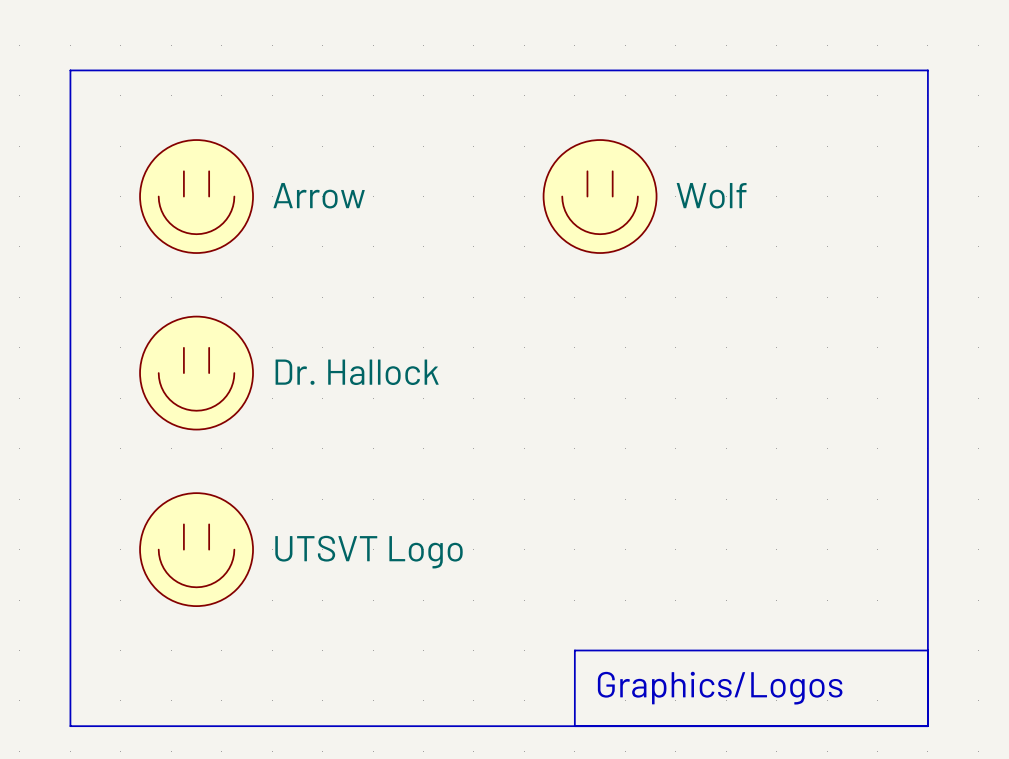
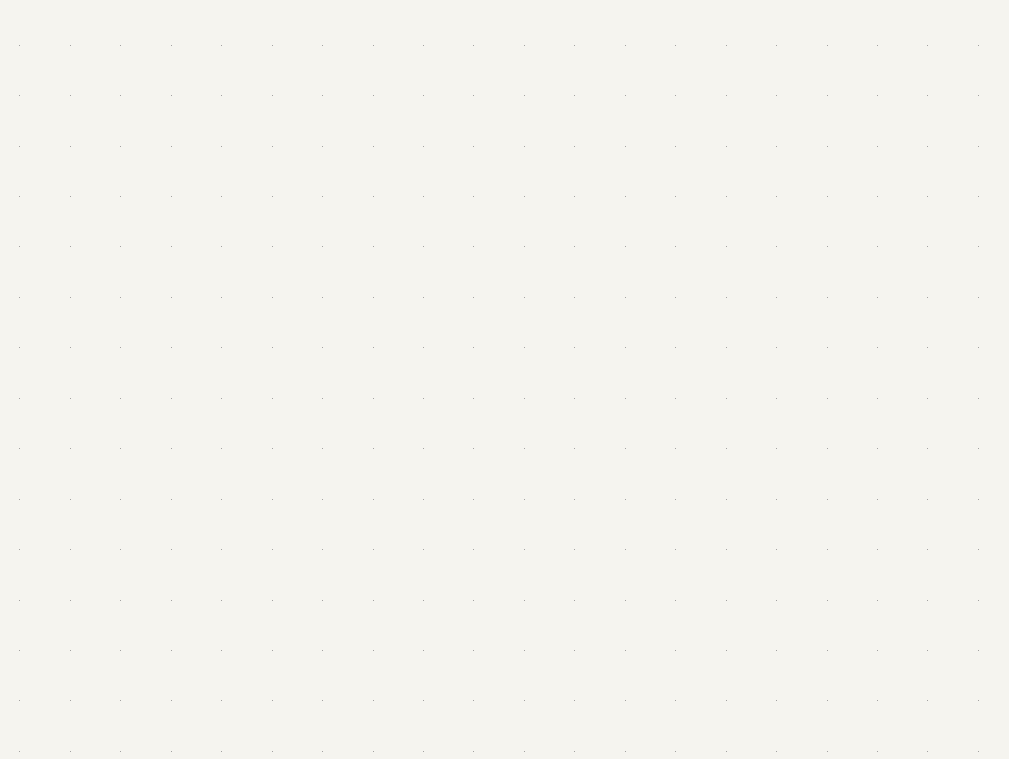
line: (70, 70) (927, 70) (927, 726) (70, 726) (70, 70) -> none
part: Arrow (196, 196) -> none
part: Wolf (600, 196) -> none
part: Dr. Hallock (196, 373) -> none
part: UTSVT Logo (196, 549) -> none
line: (927, 650) (574, 650) (574, 726) -> none
text: Graphics/Logos (720, 688) -> none

